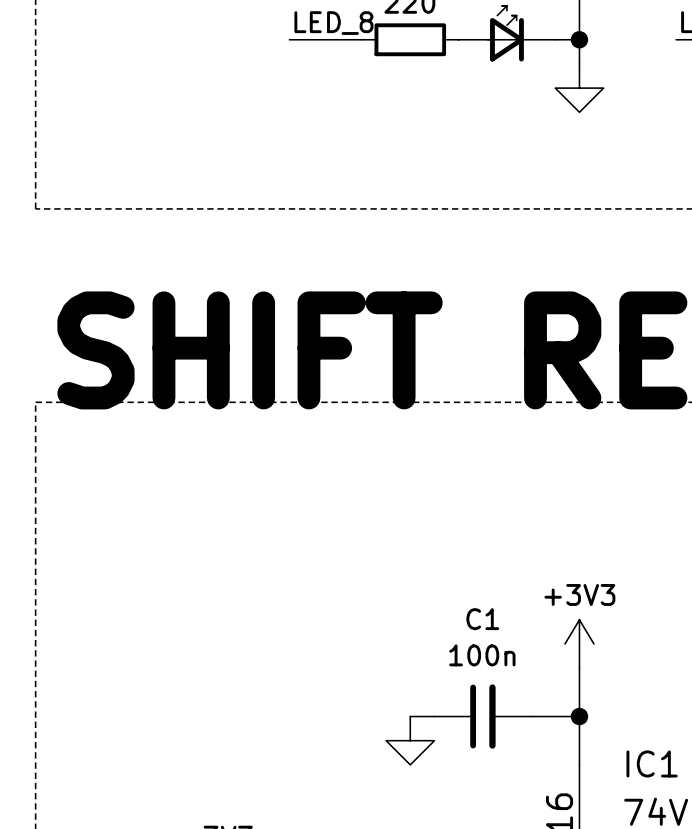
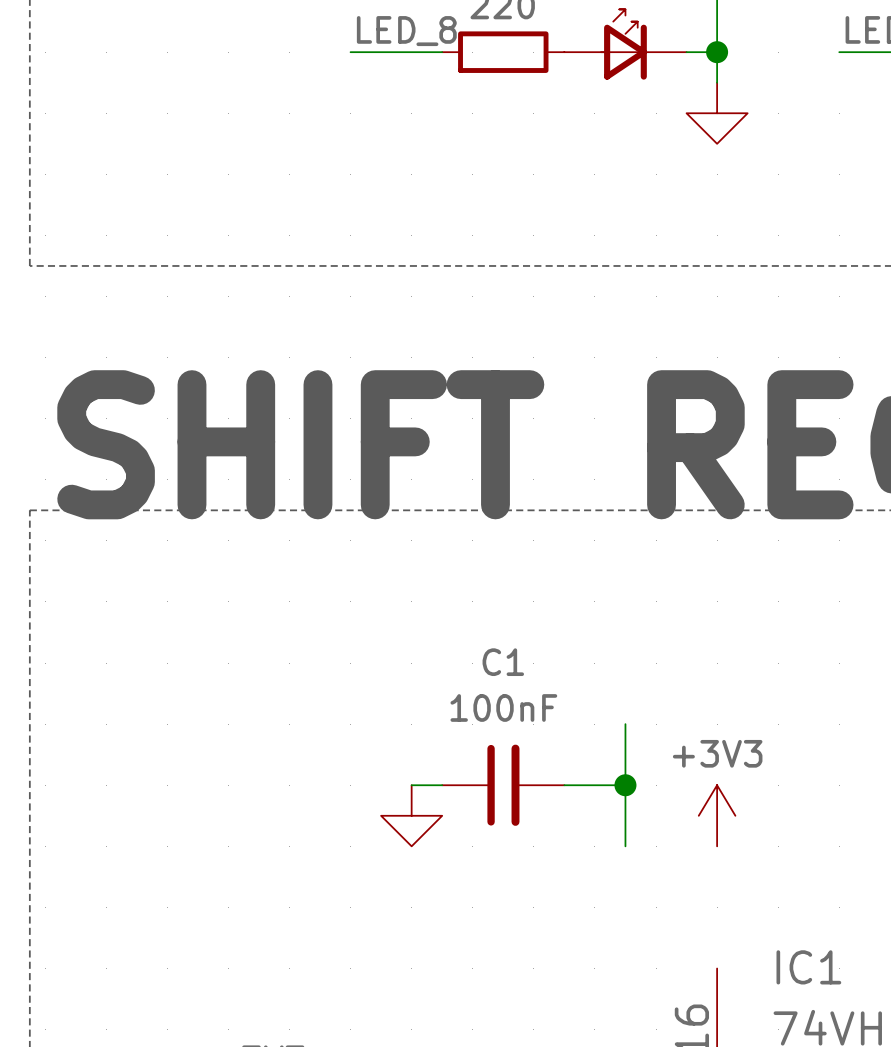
junction: none -> (625, 785)
C1 value: 100n (482, 655) -> 100nF (503, 707)
wire: (579, 668) (579, 764) -> (625, 724) (625, 846)
wire: (410, 716) (434, 716) -> (411, 785) (442, 785)
C1 position: (482, 716) -> (503, 785)
wire: (531, 716) (579, 716) -> (564, 785) (625, 785)
junction: (579, 716) -> none
power symbol position: (410, 740) -> (411, 815)

